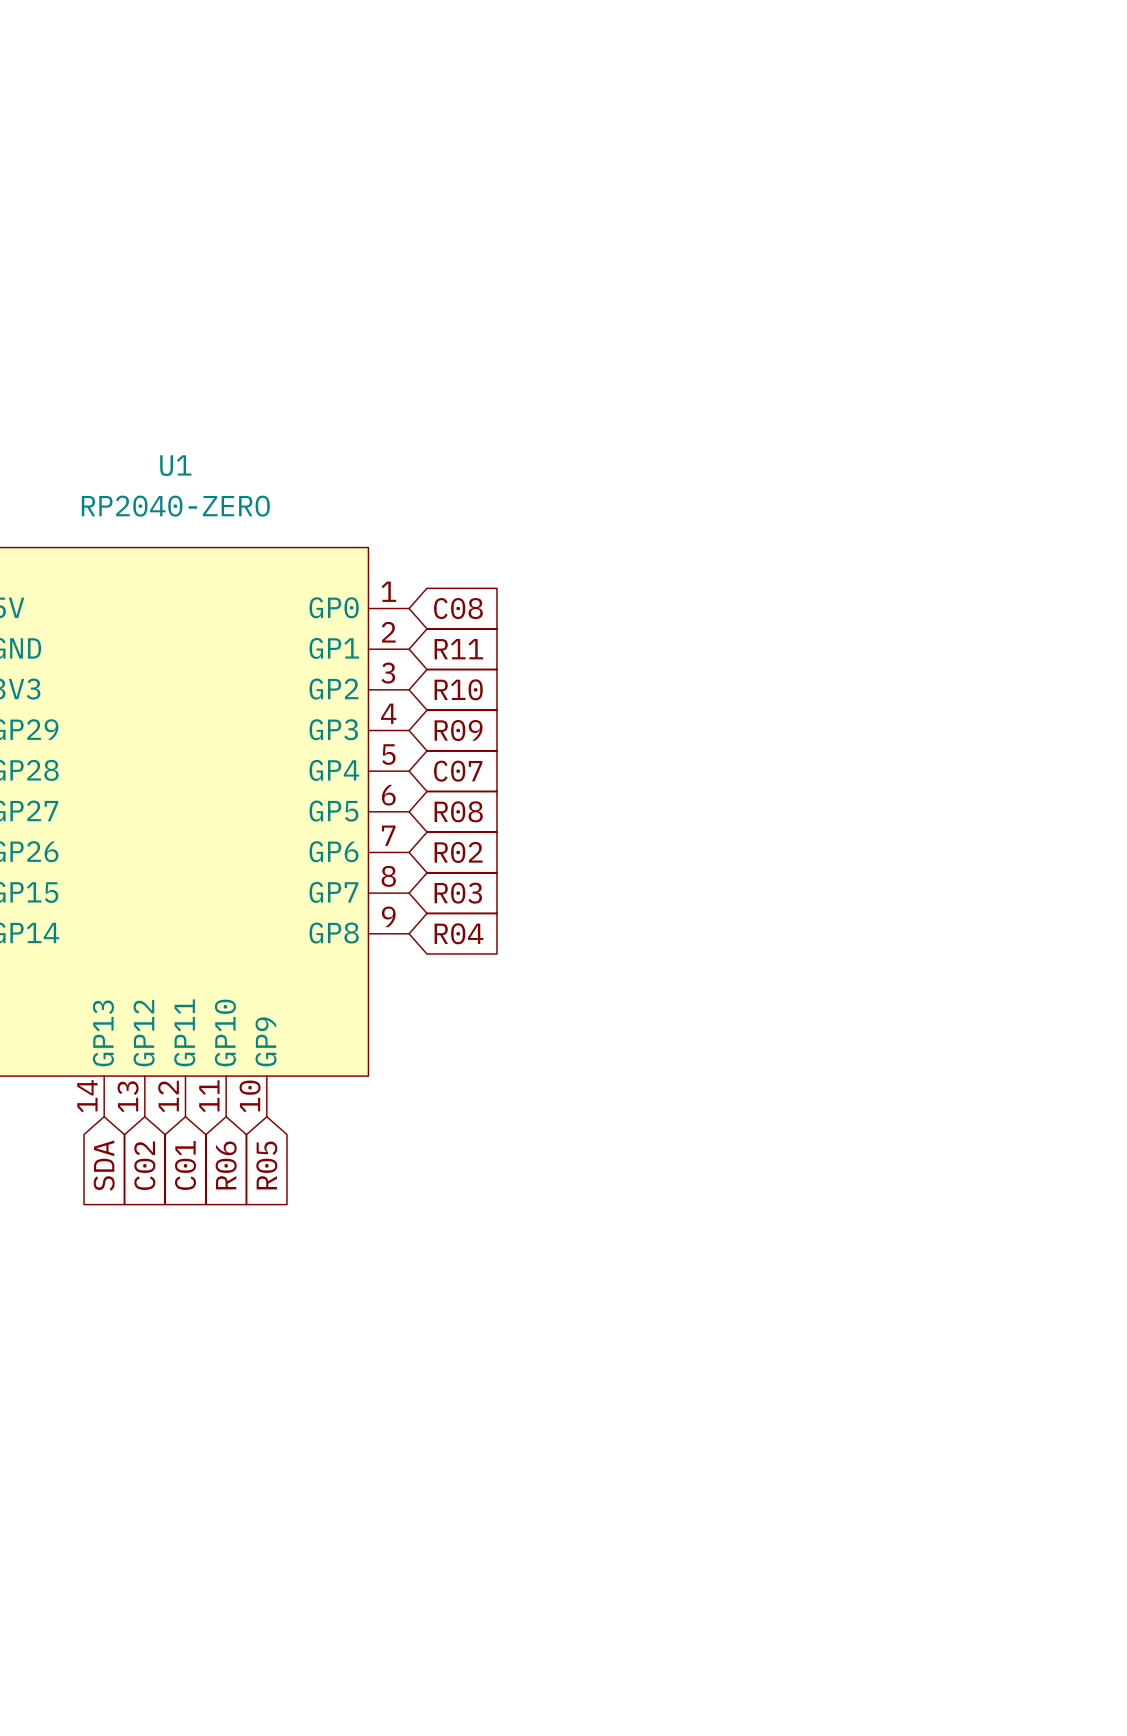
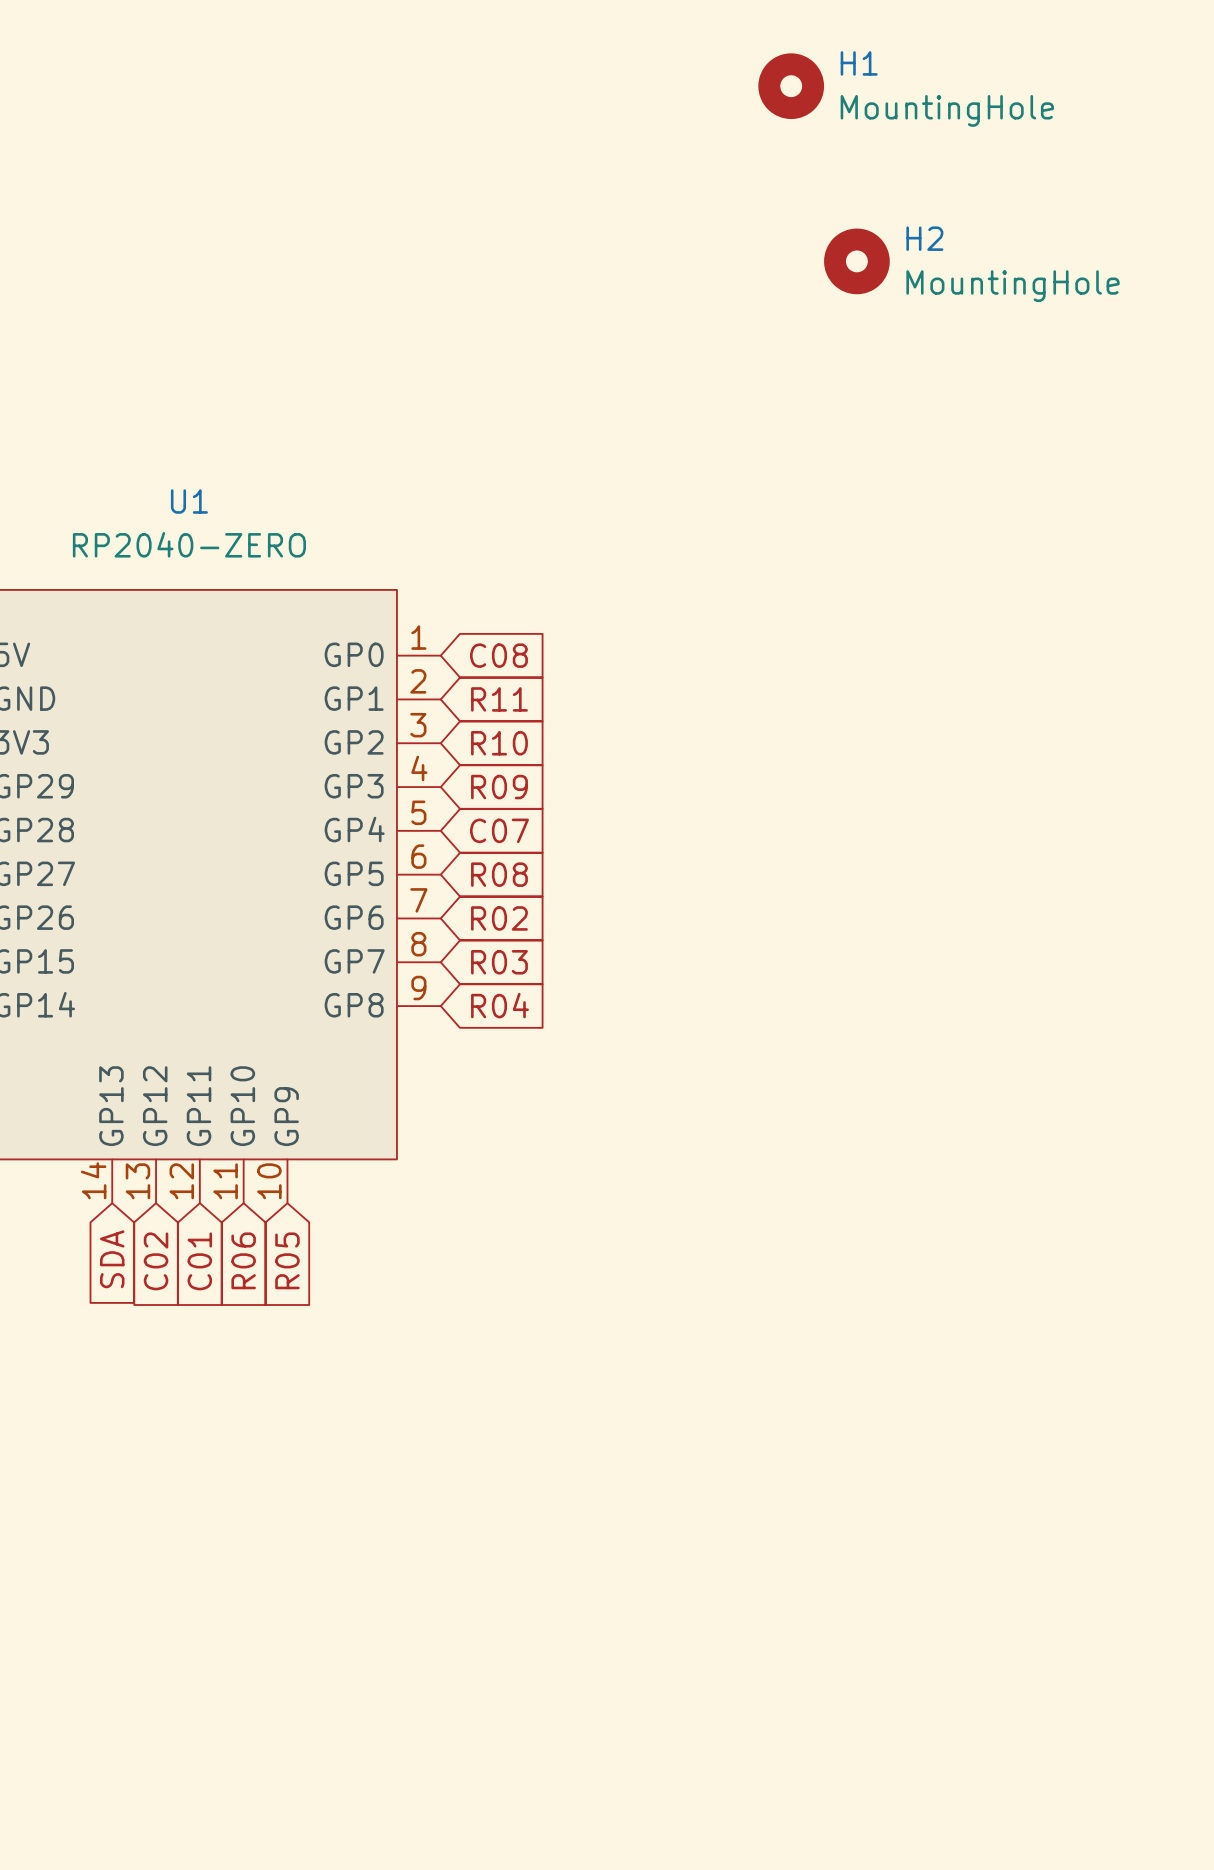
H1: none -> MountingHole (791, 86)
H2: none -> MountingHole (856, 261)

